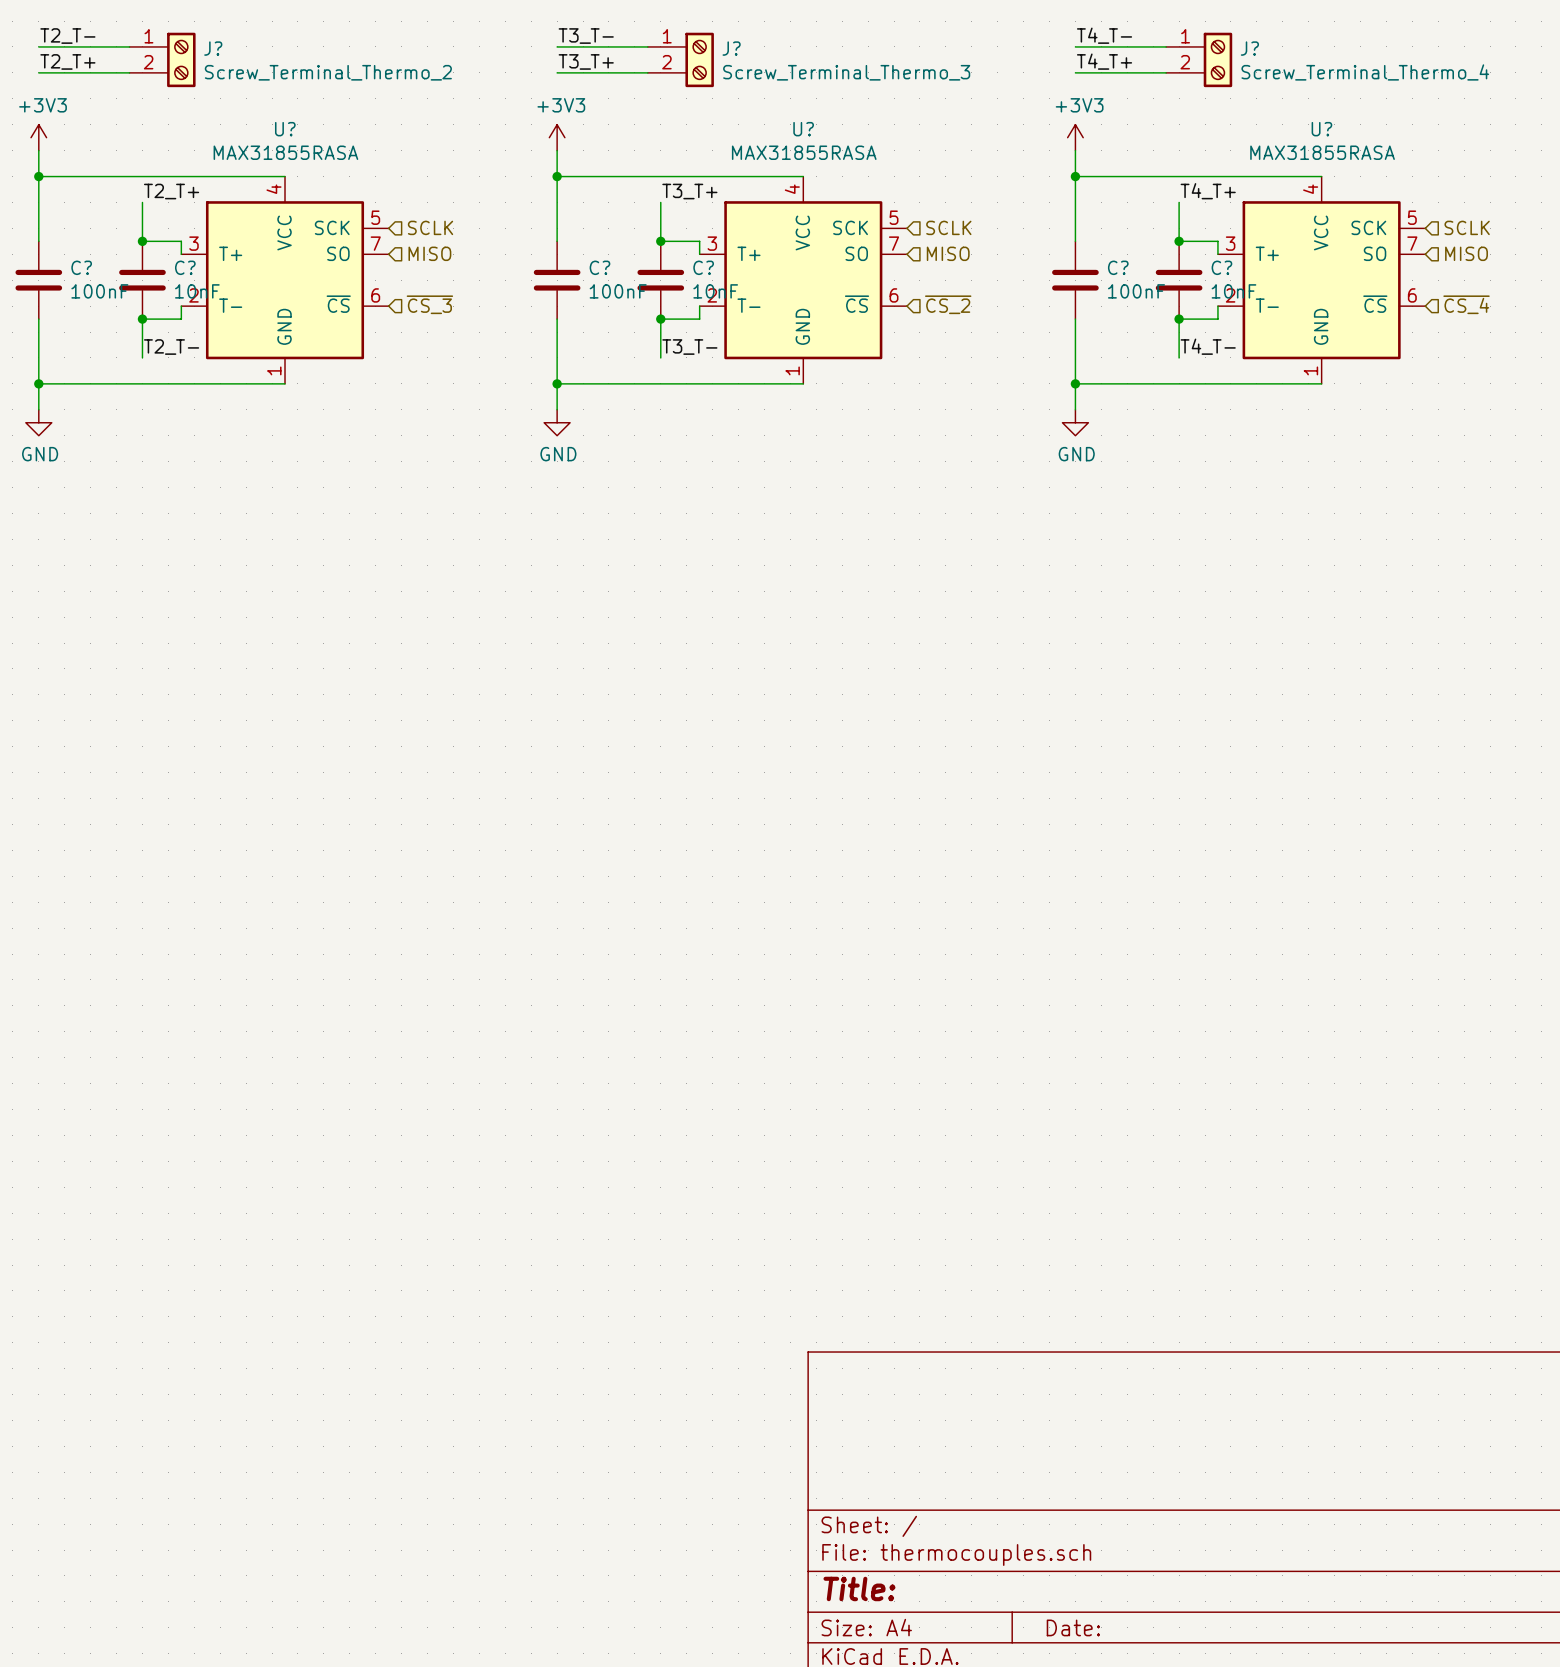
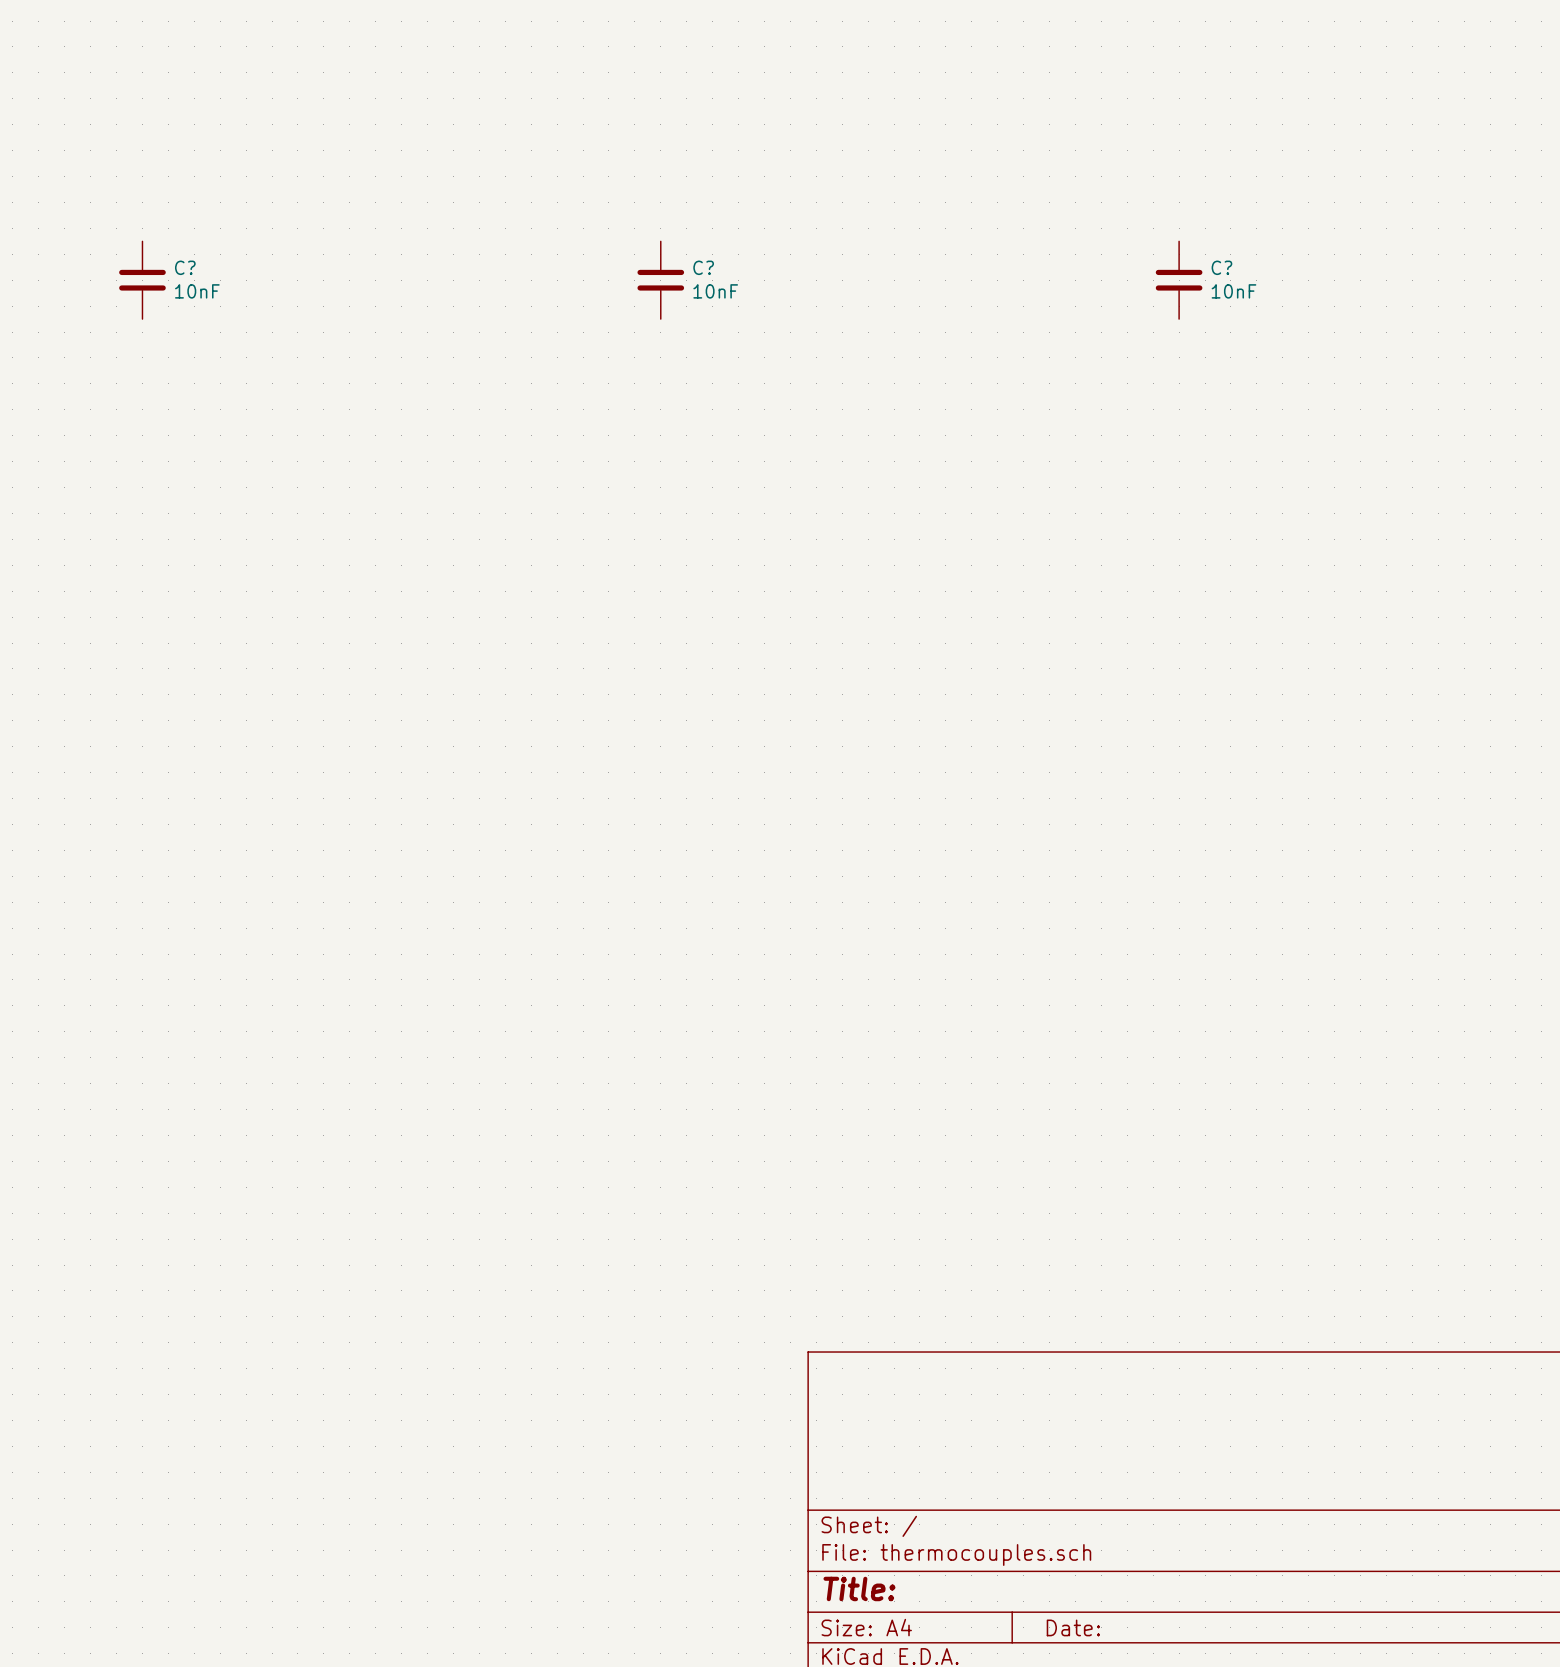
label: T4_T- (1104, 35) -> none
label: T2_T- (67, 36) -> none
label: T3_T- (586, 36) -> none
wire: (38, 46) (129, 46) -> none
wire: (557, 46) (647, 46) -> none
wire: (1075, 46) (1166, 46) -> none
J?: Screw_Terminal_Thermo_2 (162, 59) -> none
J?: Screw_Terminal_Thermo_3 (680, 59) -> none
J?: Screw_Terminal_Thermo_4 (1199, 59) -> none
label: T2_T+ (67, 61) -> none
label: T3_T+ (586, 61) -> none
label: T4_T+ (1104, 61) -> none
wire: (38, 72) (129, 72) -> none
wire: (557, 72) (647, 72) -> none
wire: (1075, 72) (1166, 72) -> none
power symbol: +3V3 (38, 137) -> none
power symbol: +3V3 (557, 137) -> none
power symbol: +3V3 (1075, 137) -> none
wire: (38, 150) (38, 241) -> none
wire: (557, 150) (557, 241) -> none
wire: (1075, 150) (1075, 241) -> none
wire: (38, 176) (285, 176) -> none
junction: (38, 176) -> none
wire: (557, 176) (803, 176) -> none
junction: (557, 176) -> none
wire: (1075, 176) (1321, 176) -> none
junction: (1075, 176) -> none
label: T2_T+ (171, 191) -> none
label: T3_T+ (689, 191) -> none
label: T4_T+ (1208, 191) -> none
wire: (142, 202) (142, 241) (181, 241) (181, 254) -> none
wire: (660, 202) (660, 241) (699, 241) (699, 254) -> none
wire: (1179, 202) (1179, 241) (1217, 241) (1217, 254) -> none
hierarchical label: SCLK (430, 227) -> none
hierarchical label: SCLK (948, 227) -> none
hierarchical label: SCLK (1467, 227) -> none
junction: (142, 241) -> none
junction: (660, 241) -> none
junction: (1179, 241) -> none
hierarchical label: MISO (429, 253) -> none
hierarchical label: MISO (948, 253) -> none
hierarchical label: MISO (1466, 253) -> none
C?: 100nF (38, 280) -> none
U?: MAX31855RASA (285, 280) -> none
C?: 100nF (557, 280) -> none
U?: MAX31855RASA (803, 280) -> none
C?: 100nF (1075, 280) -> none
U?: MAX31855RASA (1321, 280) -> none
hierarchical label: ~{CS_3} (429, 304) -> none
hierarchical label: ~{CS_2} (948, 304) -> none
hierarchical label: ~{CS_4} (1466, 304) -> none
wire: (181, 306) (181, 319) (142, 319) (142, 357) -> none
wire: (699, 306) (699, 319) (660, 319) (660, 357) -> none
wire: (1217, 306) (1217, 319) (1179, 319) (1179, 357) -> none
wire: (38, 319) (38, 409) -> none
junction: (142, 319) -> none
wire: (557, 319) (557, 409) -> none
junction: (660, 319) -> none
wire: (1075, 319) (1075, 409) -> none
junction: (1179, 319) -> none
label: T4_T- (1208, 346) -> none
label: T2_T- (171, 347) -> none
label: T3_T- (689, 347) -> none
wire: (38, 383) (285, 383) -> none
junction: (38, 383) -> none
wire: (557, 383) (803, 383) -> none
junction: (557, 383) -> none
wire: (1075, 383) (1321, 383) -> none
junction: (1075, 383) -> none
power symbol: GND (38, 422) -> none
power symbol: GND (557, 422) -> none
power symbol: GND (1075, 422) -> none

